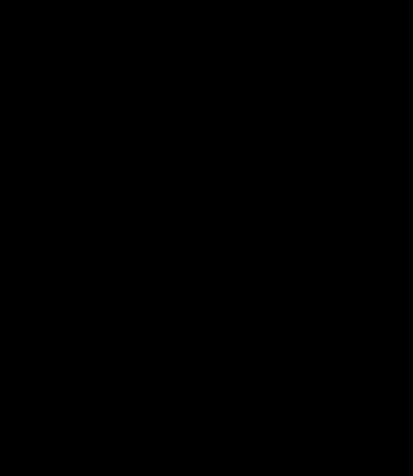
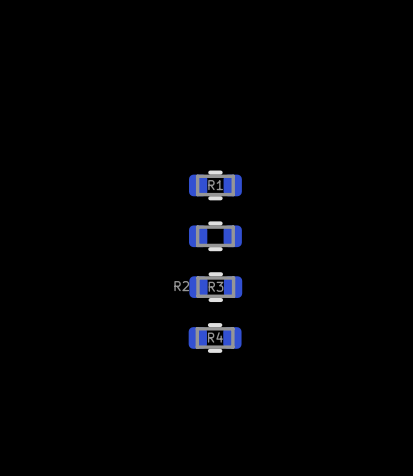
R1: none -> (215, 185)
R2: none -> (215, 236)
R3: none -> (215, 287)
R4: none -> (215, 337)

